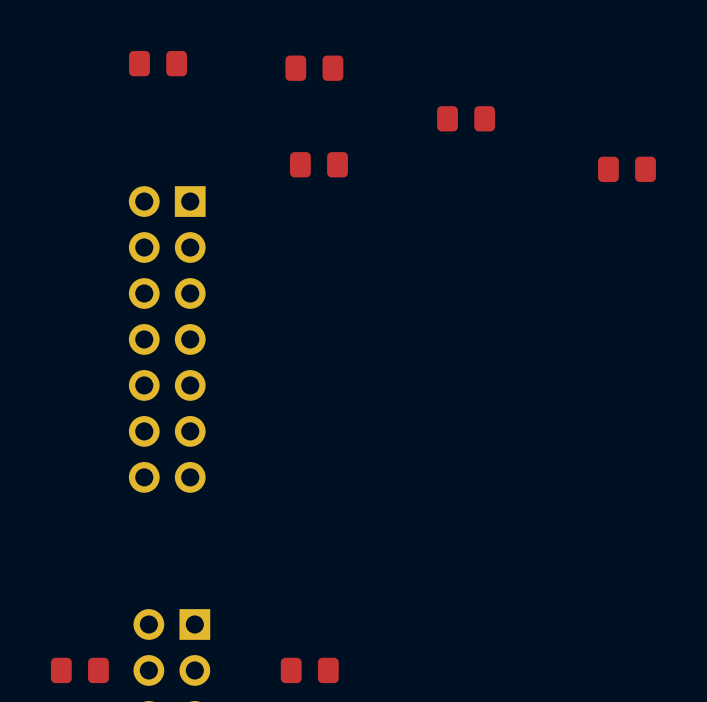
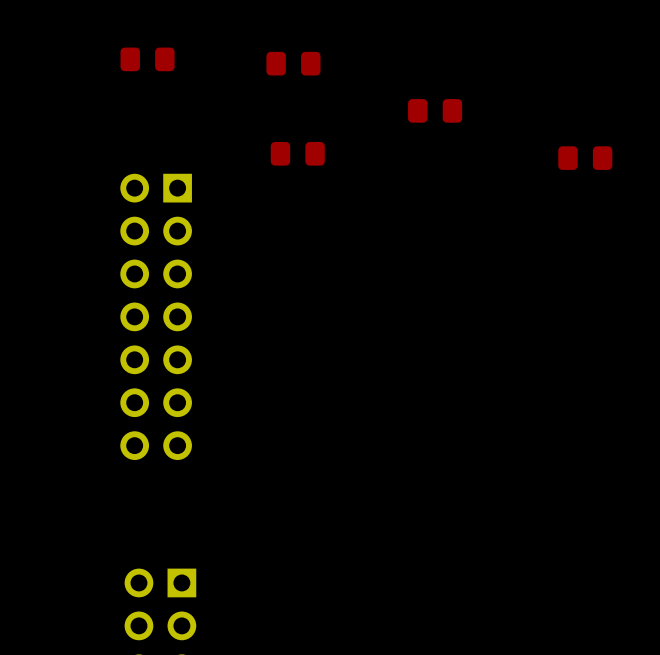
part: (79, 670) -> none
part: (309, 670) -> none

